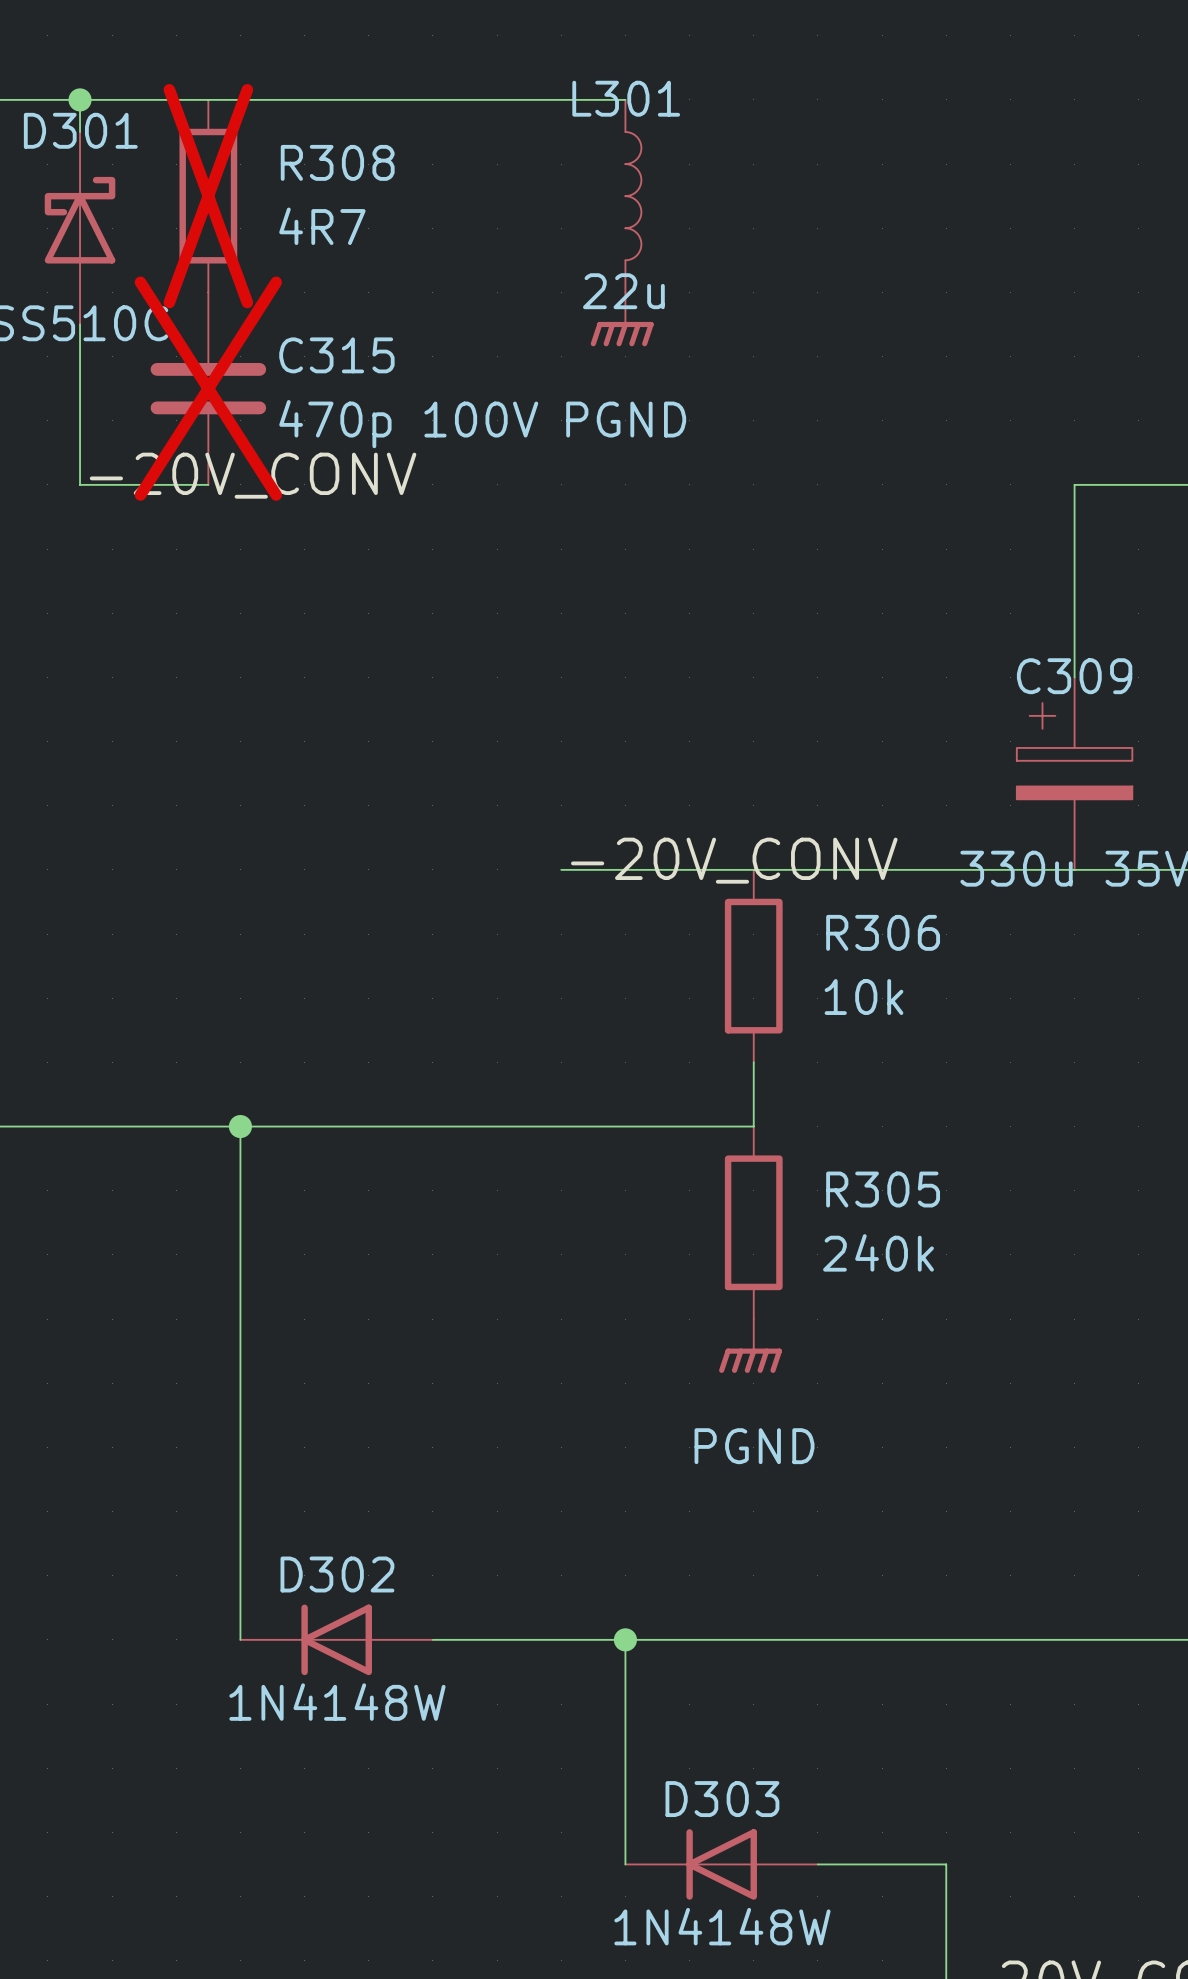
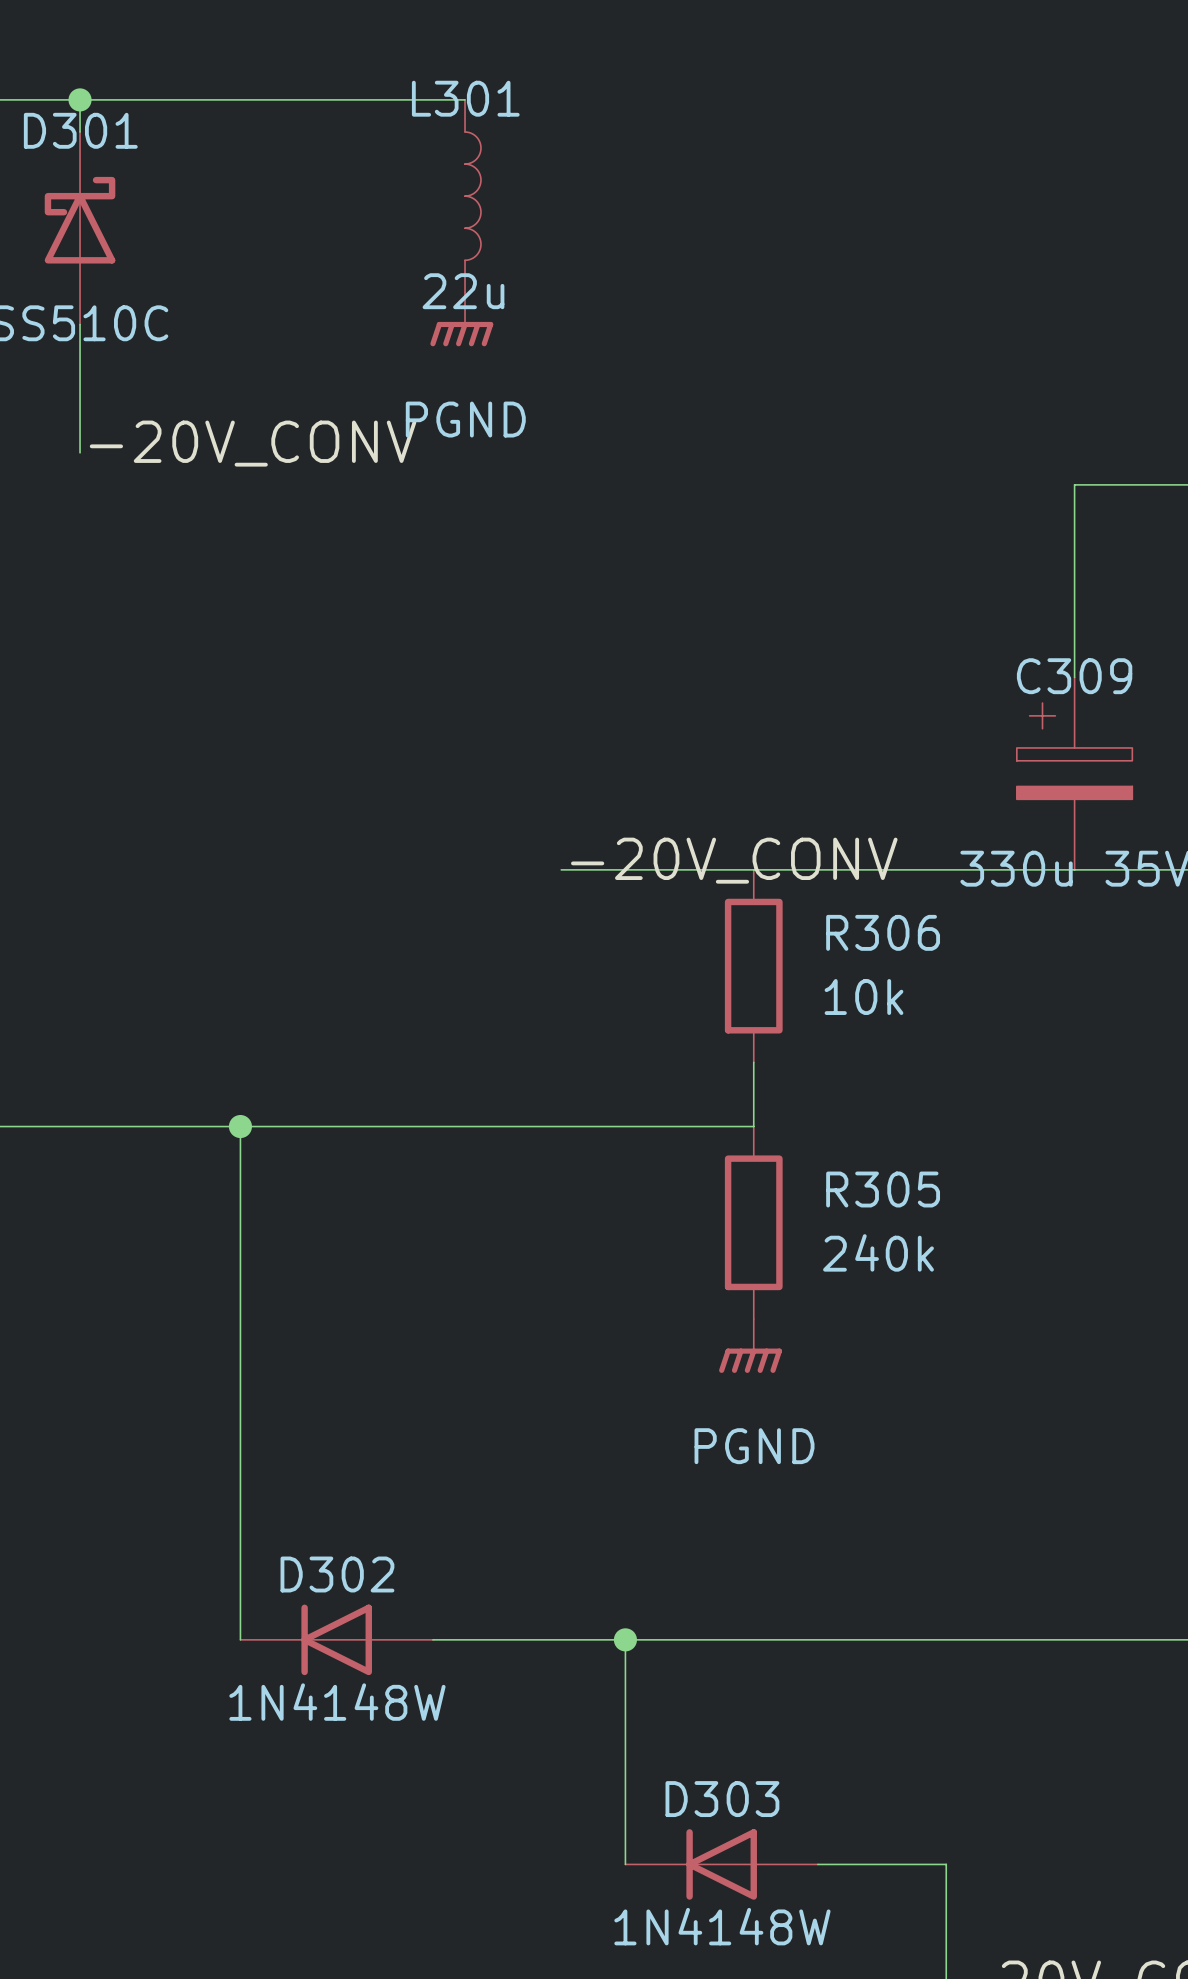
wire: (465, 99) (625, 99) -> none
R308: 4R7 (208, 196) -> none
L301 position: (633, 196) -> (473, 196)
power symbol position: PGND (622, 319) -> PGND (461, 319)
C315: 470p 100V (208, 388) -> none
wire: (80, 452) (80, 484) (208, 484) -> none
label position: -20V_CONV (253, 475) -> -20V_CONV (253, 443)

